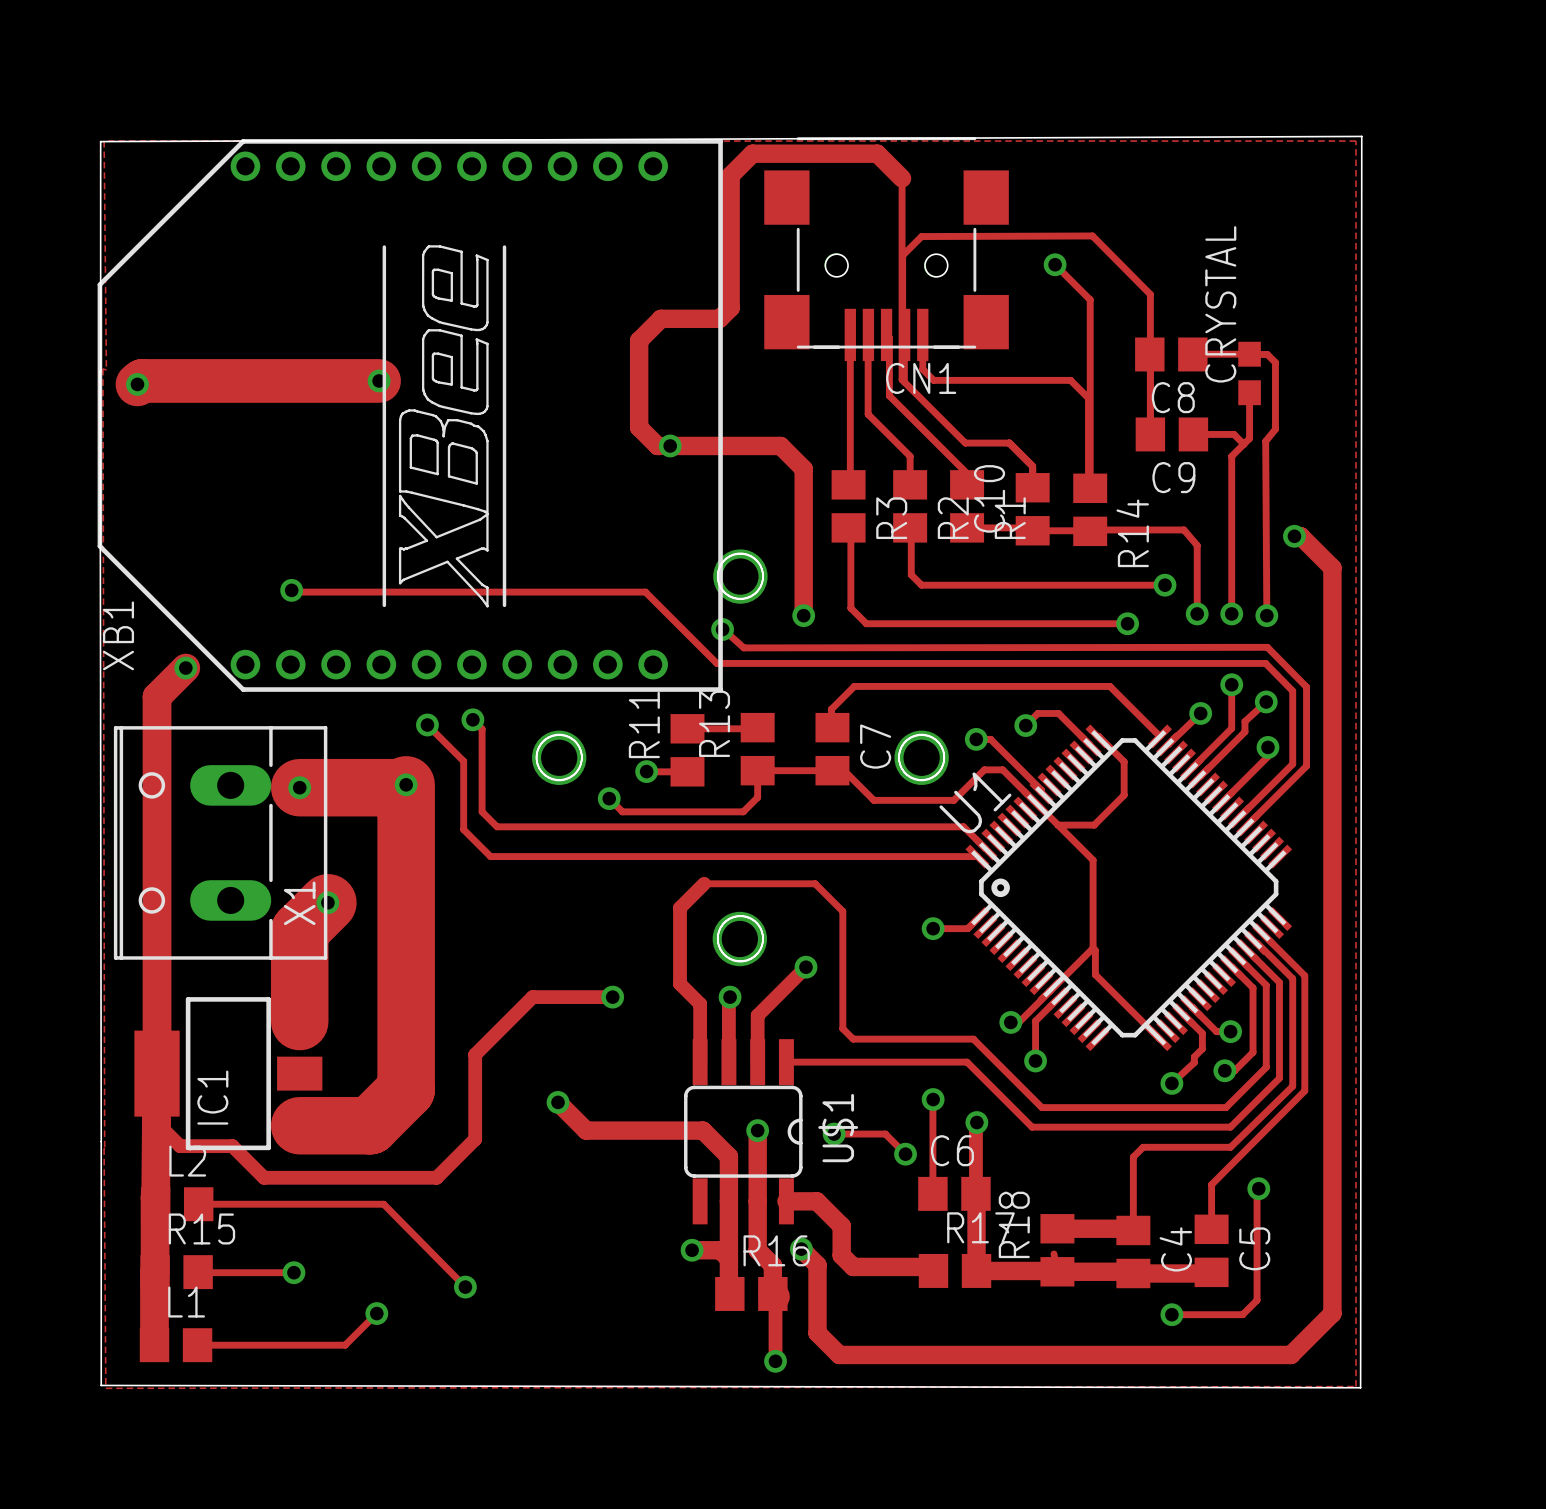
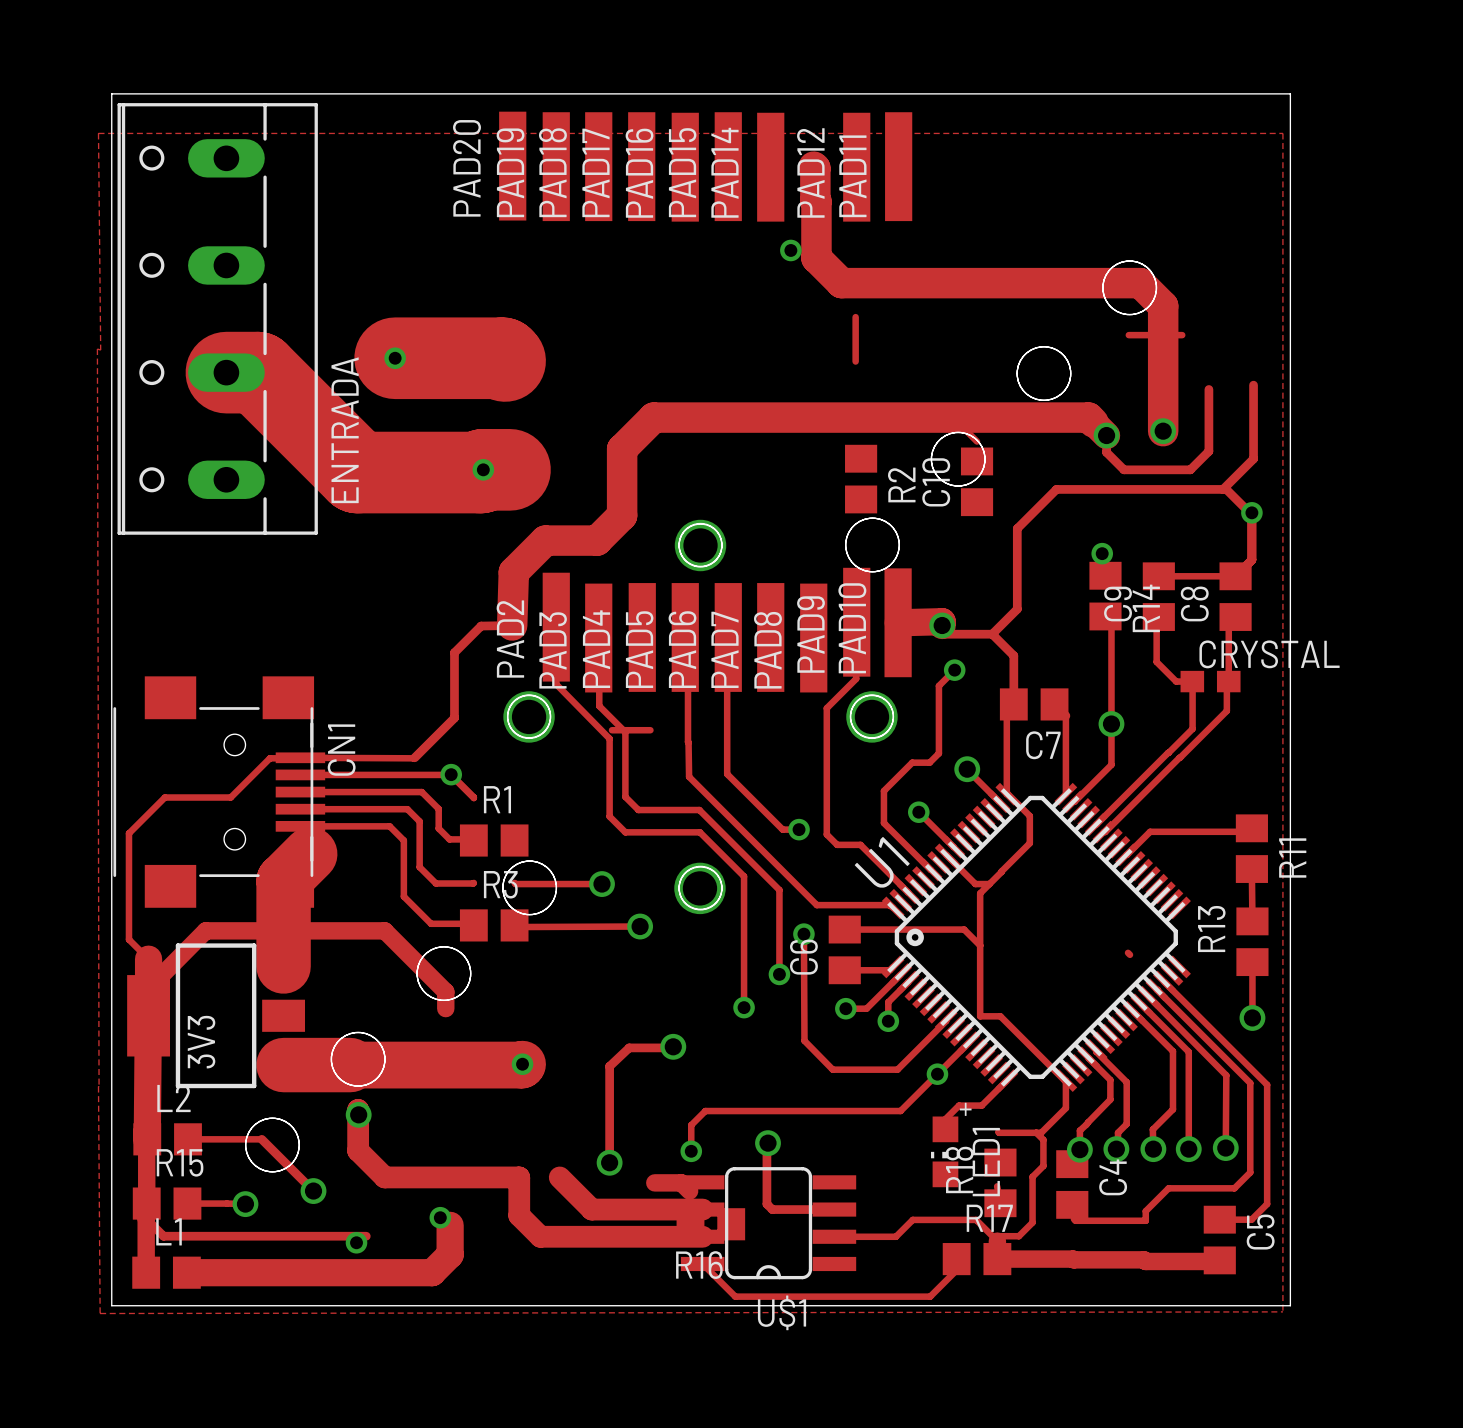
board edge: (1361, 136) (1360, 1387) (101, 1385) (100, 141) (1361, 136) -> (111, 93) (111, 1305) (1290, 1305) (1290, 93) (111, 93)
PAD20: none -> (512, 166)
PAD19: none -> (556, 166)
PAD18: none -> (598, 166)
PAD17: none -> (641, 166)
PAD16: none -> (685, 167)
PAD15: none -> (728, 166)
PAD14: none -> (770, 167)
track: none -> (813, 166) (815, 168) (816, 201) (816, 258) (841, 283) (1140, 283) (1163, 305) (1163, 431)
PAD12: none -> (856, 167)
PAD11: none -> (898, 166)
CN1 rotation: 0° (886, 249) -> 90° counterclockwise (219, 792)
CN1 position: (886, 249) -> (219, 792)
track: (1055, 264) (1090, 299) (1090, 488) (1088, 486) (1088, 398) (1070, 380) (933, 380) (922, 369) (922, 334) -> none
via: (1055, 264) -> none
round board edge: none -> [1102, 261, 1157, 315]
track: (850, 334) (850, 483) (848, 484) -> none
track: (886, 334) (889, 337) (889, 395) (967, 473) (967, 484) -> none
track: (904, 334) (902, 332) (902, 255) (921, 236) (1092, 235) (1150, 294) (1150, 434) -> none
track: (868, 335) (868, 414) (910, 456) (910, 484) -> none
ENTRADA: none -> (217, 318)
C8 rotation: 0° (1171, 354) -> 90° clockwise (1235, 596)
C8 position: (1171, 354) -> (1235, 596)
track: (1249, 354) (1267, 354) (1275, 362) (1275, 429) (1265, 441) (1266, 615) -> none
round board edge: none -> [1017, 346, 1071, 401]
CRYSTAL rotation: 0° (1249, 373) -> 90° clockwise (1210, 681)
CRYSTAL position: (1249, 373) -> (1210, 681)
track: none -> (395, 358) (502, 358) (505, 360)
track: (379, 380) (142, 380) (137, 384) -> none
via position: (379, 380) -> (395, 358)
via: (137, 384) -> none
track: (1249, 392) (1249, 438) (1231, 456) (1231, 613) -> none
track: none -> (226, 372) (257, 372) (357, 472) (480, 472) (483, 469) (510, 469)
track: none -> (1253, 385) (1253, 458) (1223, 489)
track: none -> (1208, 389) (1208, 451) (1190, 469) (1123, 469) (1106, 452) (1106, 435) (1088, 417) (653, 417) (622, 449) (622, 515) (597, 540) (545, 540) (513, 572) (512, 625) (481, 626) (454, 652) (454, 718) (414, 757)
XB1: (410, 415) -> none
C9 rotation: 0° (1171, 434) -> 90° clockwise (1158, 596)
C9 position: (1171, 434) -> (1158, 596)
track: (1193, 434) (1234, 434) (1243, 444) -> none
via: (670, 445) -> none
via: none -> (1163, 431)
round board edge: none -> [931, 432, 986, 487]
via: none -> (1106, 435)
track: (1032, 487) (1032, 466) (1009, 443) (965, 443) (902, 379) (902, 178) (877, 153) (752, 153) (730, 175) (730, 307) (719, 318) (661, 318) (639, 340) (639, 427) (657, 445) (780, 445) (803, 468) (803, 615) -> none
via: none -> (483, 469)
R3 rotation: 0° (848, 506) -> 90° clockwise (494, 925)
R3 position: (848, 506) -> (494, 925)
R1 rotation: 0° (967, 506) -> 90° clockwise (494, 840)
R1 position: (967, 506) -> (494, 840)
R14 position: (1090, 509) -> (1105, 596)
R3 name position: R3 (891, 518) -> R3 (500, 884)
R1 name position: R1 (1010, 518) -> R1 (497, 799)
track: (848, 527) (850, 530) (850, 608) (866, 623) (1127, 623) -> none
track: (910, 527) (911, 574) (921, 585) (1165, 585) -> none
track: (967, 527) (1029, 527) (1032, 530) (1090, 531) (1183, 529) (1197, 545) (1197, 613) -> none
track: (1294, 536) (1300, 536) (1332, 567) (1332, 1313) (1291, 1354) (839, 1354) (817, 1333) (817, 1265) (801, 1249) -> none
via position: (1294, 536) -> (1251, 512)
track: none -> (1251, 512) (1251, 559) (1235, 576)
track: none -> (1251, 514) (1226, 489) (1056, 489) (1017, 528) (1017, 609) (992, 634)
round board edge: none -> [845, 518, 900, 572]
track: (291, 590) (293, 592) (645, 592) (716, 663) (1265, 663) (1292, 691) (1292, 764) (1240, 816) -> none
via: (291, 590) -> none
track: none -> (1158, 576) (1235, 576)
via: (1197, 613) -> none
via: (1231, 613) -> none
via: (803, 615) -> none
via: (1266, 615) -> none
via: (1127, 623) -> none
track: (722, 629) (743, 647) (1267, 647) (1306, 687) (1306, 766) (1248, 824) -> none
via: (722, 629) -> none
track: none -> (1105, 616) (1111, 622) (1111, 764) (1073, 801)
track: none -> (1158, 617) (1156, 619) (1156, 661) (1176, 681) (1192, 681)
track: none -> (1235, 617) (1228, 623) (1226, 710) (1103, 832)
track: none -> (856, 622) (856, 678) (826, 708) (826, 834) (837, 844) (860, 844) (908, 892)
PAD9: none -> (856, 622)
track: none -> (898, 622) (942, 621) (943, 634) (992, 634)
PAD10: none -> (898, 622)
via: none -> (942, 625)
track: none -> (556, 627) (556, 684) (609, 738) (609, 816) (625, 832) (699, 832) (744, 876) (744, 1007)
PAD2: none -> (556, 627)
track: (185, 668) (157, 696) (157, 1013) -> (454, 717) (413, 758) (269, 758) (230, 797) (164, 797) (128, 833) (128, 939) (148, 959)
via: (185, 668) -> none
track: none -> (992, 634) (1013, 655) (1013, 704) (1006, 711) (1006, 794) (1029, 816) (1029, 843) (980, 893) (980, 1016) (1000, 1016) (1065, 1080) (1065, 1108) (1041, 1132) (998, 1132)
PAD4: none -> (642, 637)
track: none -> (685, 637) (687, 640) (689, 776) (816, 905) (889, 905) (893, 907)
PAD5: none -> (685, 637)
track: none -> (728, 637) (727, 774) (782, 829) (799, 829)
PAD6: none -> (728, 637)
PAD7: none -> (770, 637)
track: none -> (598, 638) (599, 706) (625, 732) (625, 796) (638, 810) (699, 810) (779, 890) (779, 974)
PAD3: none -> (598, 638)
PAD8: none -> (813, 638)
track: (1231, 684) (1231, 728) (1192, 768) -> none
via: (1231, 684) -> none
track: (1266, 701) (1244, 721) (1244, 731) (1200, 776) -> none
via: (1266, 701) -> none
track: none -> (954, 670) (938, 685) (938, 753) (929, 762) (912, 762) (883, 790) (883, 823) (930, 869)
via: none -> (954, 670)
track: (1200, 713) (1168, 744) -> none
via: (1200, 713) -> none
track: (472, 719) (482, 729) (482, 811) (497, 826) (963, 826) (985, 848) -> none
via: (472, 719) -> none
track: none -> (1192, 681) (1192, 728) (1096, 824)
track: (427, 724) (463, 761) (463, 829) (490, 856) (977, 856) -> none
via: (427, 724) -> none
R11 name position: R11 (644, 724) -> R11 (1292, 858)
track: (1025, 725) (1037, 713) (1058, 713) (1089, 744) -> none
via: (1025, 725) -> none
track: (757, 727) (687, 728) -> none
track: (832, 727) (831, 709) (854, 686) (1109, 686) (1159, 736) -> none
track: (1097, 736) (1124, 761) (1124, 795) (1094, 825) (1058, 825) -> none
track: (976, 739) (990, 739) (1041, 790) (1041, 792) -> none
via: (976, 739) -> none
track: none -> (1054, 704) (1065, 715) (1065, 794)
track: (1267, 747) (1268, 756) (1224, 800) -> none
via: (1267, 747) -> none
R13 position: (757, 749) -> (1252, 941)
C7 rotation: 0° (832, 749) -> 90° clockwise (1034, 704)
C7 position: (832, 749) -> (1034, 704)
R11 position: (687, 750) -> (1251, 848)
via: none -> (1111, 724)
via: (646, 771) -> none
track: (406, 784) (406, 1089) (370, 1125) -> (522, 1064) (350, 1065)
track: (406, 784) (403, 787) (299, 787) -> none
via: (406, 784) -> none
via: (299, 787) -> none
track: (609, 798) (622, 811) (743, 811) (757, 797) (757, 770) (843, 770) (873, 800) (953, 800) (984, 769) (1002, 769) (1093, 860) (1093, 948) -> none
via: (609, 798) -> none
track: none -> (967, 769) (999, 801)
via: none -> (967, 769)
track: none -> (451, 774) (473, 798) (450, 774) (300, 774)
via: none -> (451, 774)
track: none -> (300, 792) (421, 792) (438, 808) (438, 828) (449, 839) (473, 840)
X1: (220, 842) -> none
track: none -> (300, 809) (407, 809) (419, 821) (419, 867) (435, 883) (473, 882)
track: none -> (918, 812) (953, 847)
via: none -> (918, 812)
track: none -> (300, 826) (389, 826) (403, 840) (403, 896) (431, 923) (472, 923) (473, 925)
track: none -> (1251, 828) (1248, 831) (1150, 831) (1126, 854)
via: none -> (799, 829)
U1 position: (1128, 887) -> (1036, 937)
via: (327, 902) -> none
track: none -> (946, 854) (975, 884) (989, 884)
round board edge: none -> [502, 861, 557, 915]
track: none -> (1251, 869) (1252, 921)
track: (977, 919) (967, 928) (933, 928) -> none
via: (933, 928) -> none
track: none -> (514, 882) (601, 884)
via: none -> (601, 884)
track: (1264, 935) (1304, 975) (1304, 1090) (1211, 1184) (1211, 1229) -> none
track: (1256, 943) (1292, 978) (1292, 1086) (1230, 1147) (1143, 1147) (1133, 1157) (1133, 1230) (1131, 1228) (1057, 1228) -> none
track: (1093, 948) (1018, 1022) (1010, 1022) -> none
track: (1093, 948) (1095, 950) (1095, 974) (1159, 1039) -> none
track: (1248, 951) (1279, 982) (1279, 1078) (1230, 1127) (1032, 1127) (967, 1062) (786, 1062) -> none
track: (1240, 959) (1266, 985) (1266, 1067) (1225, 1107) (1041, 1107) (973, 1039) (853, 1039) (842, 1028) (842, 911) (815, 883) (704, 883) (680, 907) (680, 983) (700, 1004) (700, 1062) -> none
track: (806, 967) (757, 1015) (757, 1062) -> none
via: (806, 967) -> none
track: (1232, 967) (1253, 987) (1253, 1052) (1234, 1070) (1224, 1070) -> none
track: none -> (514, 925) (516, 927) (640, 926)
via: none -> (640, 926)
track: none -> (844, 929) (964, 929) (980, 945)
track: none -> (803, 934) (804, 1040) (832, 1069) (897, 1069) (946, 1019)
via: none -> (803, 934)
track: (612, 997) (532, 997) (475, 1054) (475, 1139) (436, 1177) (264, 1177) (232, 1146) (180, 1146) (156, 1122) -> none
via: (612, 997) -> none
track: (730, 997) (728, 1062) -> none
via: (730, 997) -> none
track: (1057, 999) (1035, 1021) (1035, 1060) -> none
round board edge: none -> [417, 946, 471, 1001]
track: (1192, 1007) (1216, 1031) (1230, 1031) -> none
track: (1184, 1015) (1202, 1033) (1202, 1048) (1194, 1056) (1194, 1062) (1171, 1083) -> none
track: none -> (1252, 962) (1252, 1017)
track: none -> (893, 966) (889, 970) (844, 970)
via: (1010, 1022) -> none
via: none -> (779, 974)
track: none -> (900, 974) (866, 1008) (845, 1008)
via: (1230, 1031) -> none
track: none -> (908, 982) (888, 1002) (888, 1021)
track: none -> (1164, 982) (1267, 1084) (1267, 1204) (1251, 1219) (1219, 1219)
track: none -> (148, 988) (205, 930) (384, 930) (445, 991) (445, 1008)
track: none -> (1157, 989) (1250, 1083) (1250, 1172) (1234, 1188) (1168, 1188) (1145, 1211) (1145, 1220) (1075, 1220) (1073, 1219)
track: none -> (1149, 997) (1226, 1075) (1225, 1148)
via: (1035, 1060) -> none
track: none -> (1141, 1004) (1188, 1051) (1188, 1149)
via: none -> (744, 1007)
via: none -> (845, 1008)
track: none -> (1134, 1012) (1172, 1051) (1172, 1109) (1152, 1129) (1153, 1149)
via: (1224, 1070) -> none
via: none -> (1252, 1017)
via: (1171, 1083) -> none
round board edge: none -> [331, 1032, 385, 1087]
IC1 name: IC1 (212, 1097) -> 3V3 (201, 1042)
track: (932, 1099) (932, 1193) -> none
via position: (933, 1099) -> (888, 1021)
track: (558, 1102) (586, 1130) (703, 1130) (728, 1156) (729, 1293) -> none
via position: (558, 1102) -> (522, 1064)
track: none -> (968, 1042) (900, 1111) (705, 1111) (691, 1125) (691, 1151)
track: none -> (673, 1046) (629, 1047) (609, 1066) (609, 1162)
via: none -> (673, 1046)
track: none -> (1096, 1050) (1126, 1082) (1126, 1124) (1118, 1132) (1116, 1149)
track: none -> (1088, 1058) (1110, 1080) (1110, 1099) (1079, 1130) (1079, 1149)
track: (976, 1122) (976, 1270) (1131, 1271) (1133, 1273) (1211, 1272) -> none
via position: (976, 1122) -> (937, 1074)
track: (757, 1130) (757, 1250) (772, 1265) (772, 1293) (775, 1296) (775, 1361) -> none
via: (757, 1130) -> none
U$1 rotation: 0° (743, 1131) -> 90° clockwise (768, 1223)
U$1 position: (743, 1131) -> (768, 1223)
track: (834, 1134) (885, 1134) (905, 1154) -> none
via: (834, 1134) -> none
track: none -> (1006, 1080) (981, 1105) (959, 1105) (945, 1119) (945, 1129)
C6 name position: C6 (952, 1150) -> C6 (803, 957)
via: (905, 1154) -> none
track: none -> (358, 1114) (358, 1109) (358, 1150) (384, 1177) (519, 1177)
via: none -> (358, 1114)
round board edge: none -> [245, 1118, 300, 1172]
track: (1258, 1188) (1257, 1190) (1257, 1300) (1242, 1314) (1171, 1314) -> none
via: (1258, 1188) -> none
C6 rotation: 0° (954, 1193) -> 90° clockwise (844, 949)
C6 position: (954, 1193) -> (844, 949)
track: none -> (1036, 1132) (1043, 1139) (1043, 1166) (1032, 1176) (1032, 1222) (1018, 1236) (1002, 1236) (997, 1241)
track: (786, 1201) (816, 1201) (841, 1226) (841, 1255) (853, 1266) (929, 1266) (933, 1270) -> none
track width: thick (155, 1204) (154, 1345) -> thin (146, 1139) (146, 1272)
track: (276, 1204) (383, 1204) (465, 1287) -> (261, 1139) (313, 1191)
track: none -> (768, 1143) (766, 1140) (766, 1204) (772, 1209) (834, 1209)
via: none -> (768, 1143)
via: none -> (1225, 1148)
via: none -> (1116, 1149)
via: none -> (1153, 1149)
via: none -> (1188, 1149)
via: none -> (1079, 1149)
via: none -> (691, 1151)
LED1: none -> (945, 1151)
via: none -> (609, 1162)
track: none -> (519, 1177) (519, 1215) (540, 1236) (702, 1236)
track: none -> (559, 1177) (591, 1209) (702, 1209)
via: (801, 1249) -> none
via: (692, 1250) -> none
R16 name position: R16 (776, 1250) -> R16 (699, 1265)
C5 position: (1211, 1250) -> (1219, 1240)
via: none -> (313, 1191)
R17 position: (955, 1270) -> (977, 1259)
track: (198, 1272) (293, 1272) -> (187, 1203) (245, 1204)
via: none -> (245, 1204)
via: (293, 1272) -> none
track: none -> (146, 1218) (163, 1236) (366, 1236)
track: none -> (834, 1236) (895, 1236) (912, 1219) (976, 1219) (997, 1241)
track: none -> (997, 1241) (997, 1259) (1144, 1259) (1145, 1261) (1219, 1260)
track: (376, 1313) (345, 1345) -> (450, 1225) (450, 1254) (432, 1272) (326, 1272)
via: (1171, 1314) -> none
track: none -> (956, 1259) (956, 1270) (930, 1296) (735, 1296) (702, 1263)
track width: thin (197, 1345) (345, 1345) -> thick (186, 1272) (326, 1272)
via: (775, 1361) -> none

